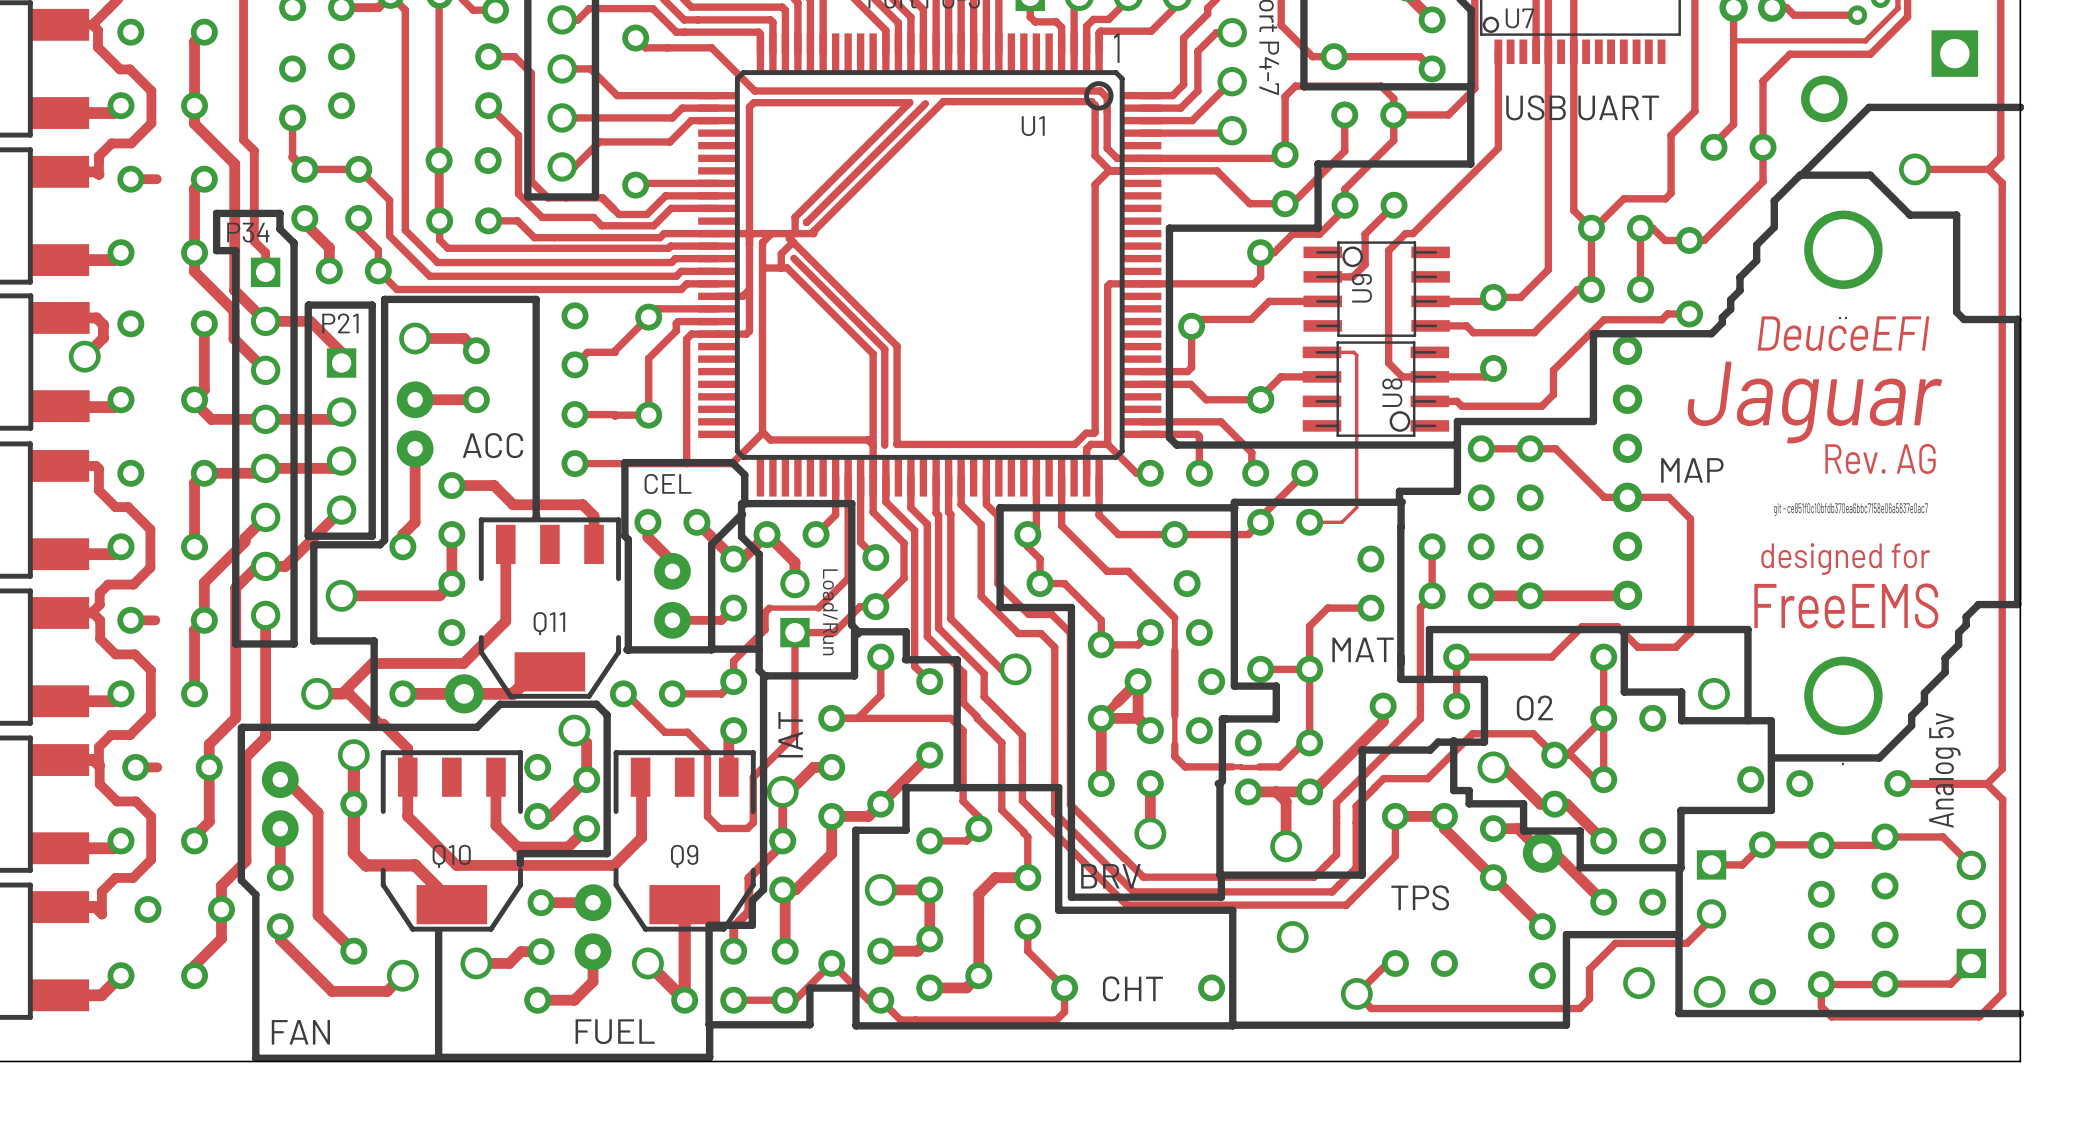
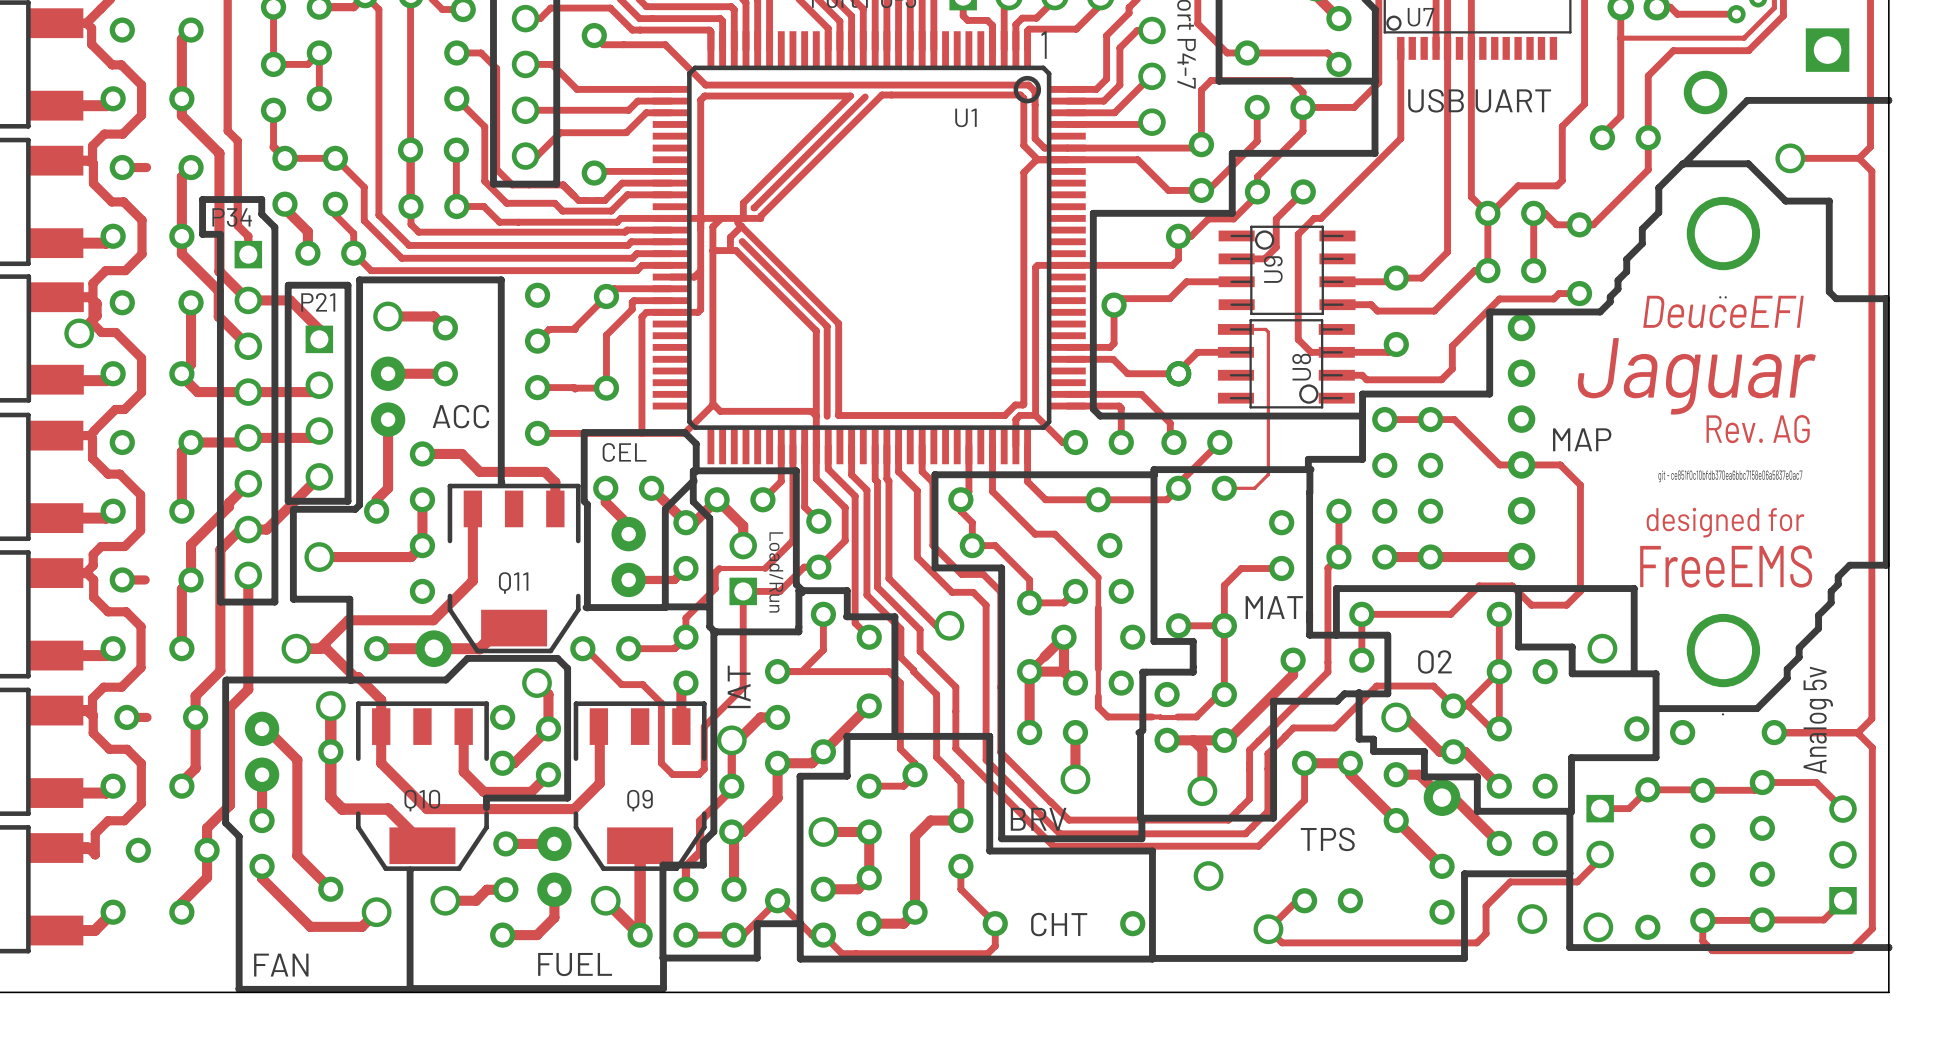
track: none -> (273, 7) (273, 64) (307, 64) (319, 52) (319, 98)
track: none -> (456, 150) (456, 206)
track: none -> (92, 162) (93, 183) (111, 201) (123, 201) (142, 220) (142, 254) (125, 270) (105, 270) (92, 283) (92, 323) (101, 332) (115, 332) (141, 358) (141, 392) (124, 409) (115, 409) (89, 435)

